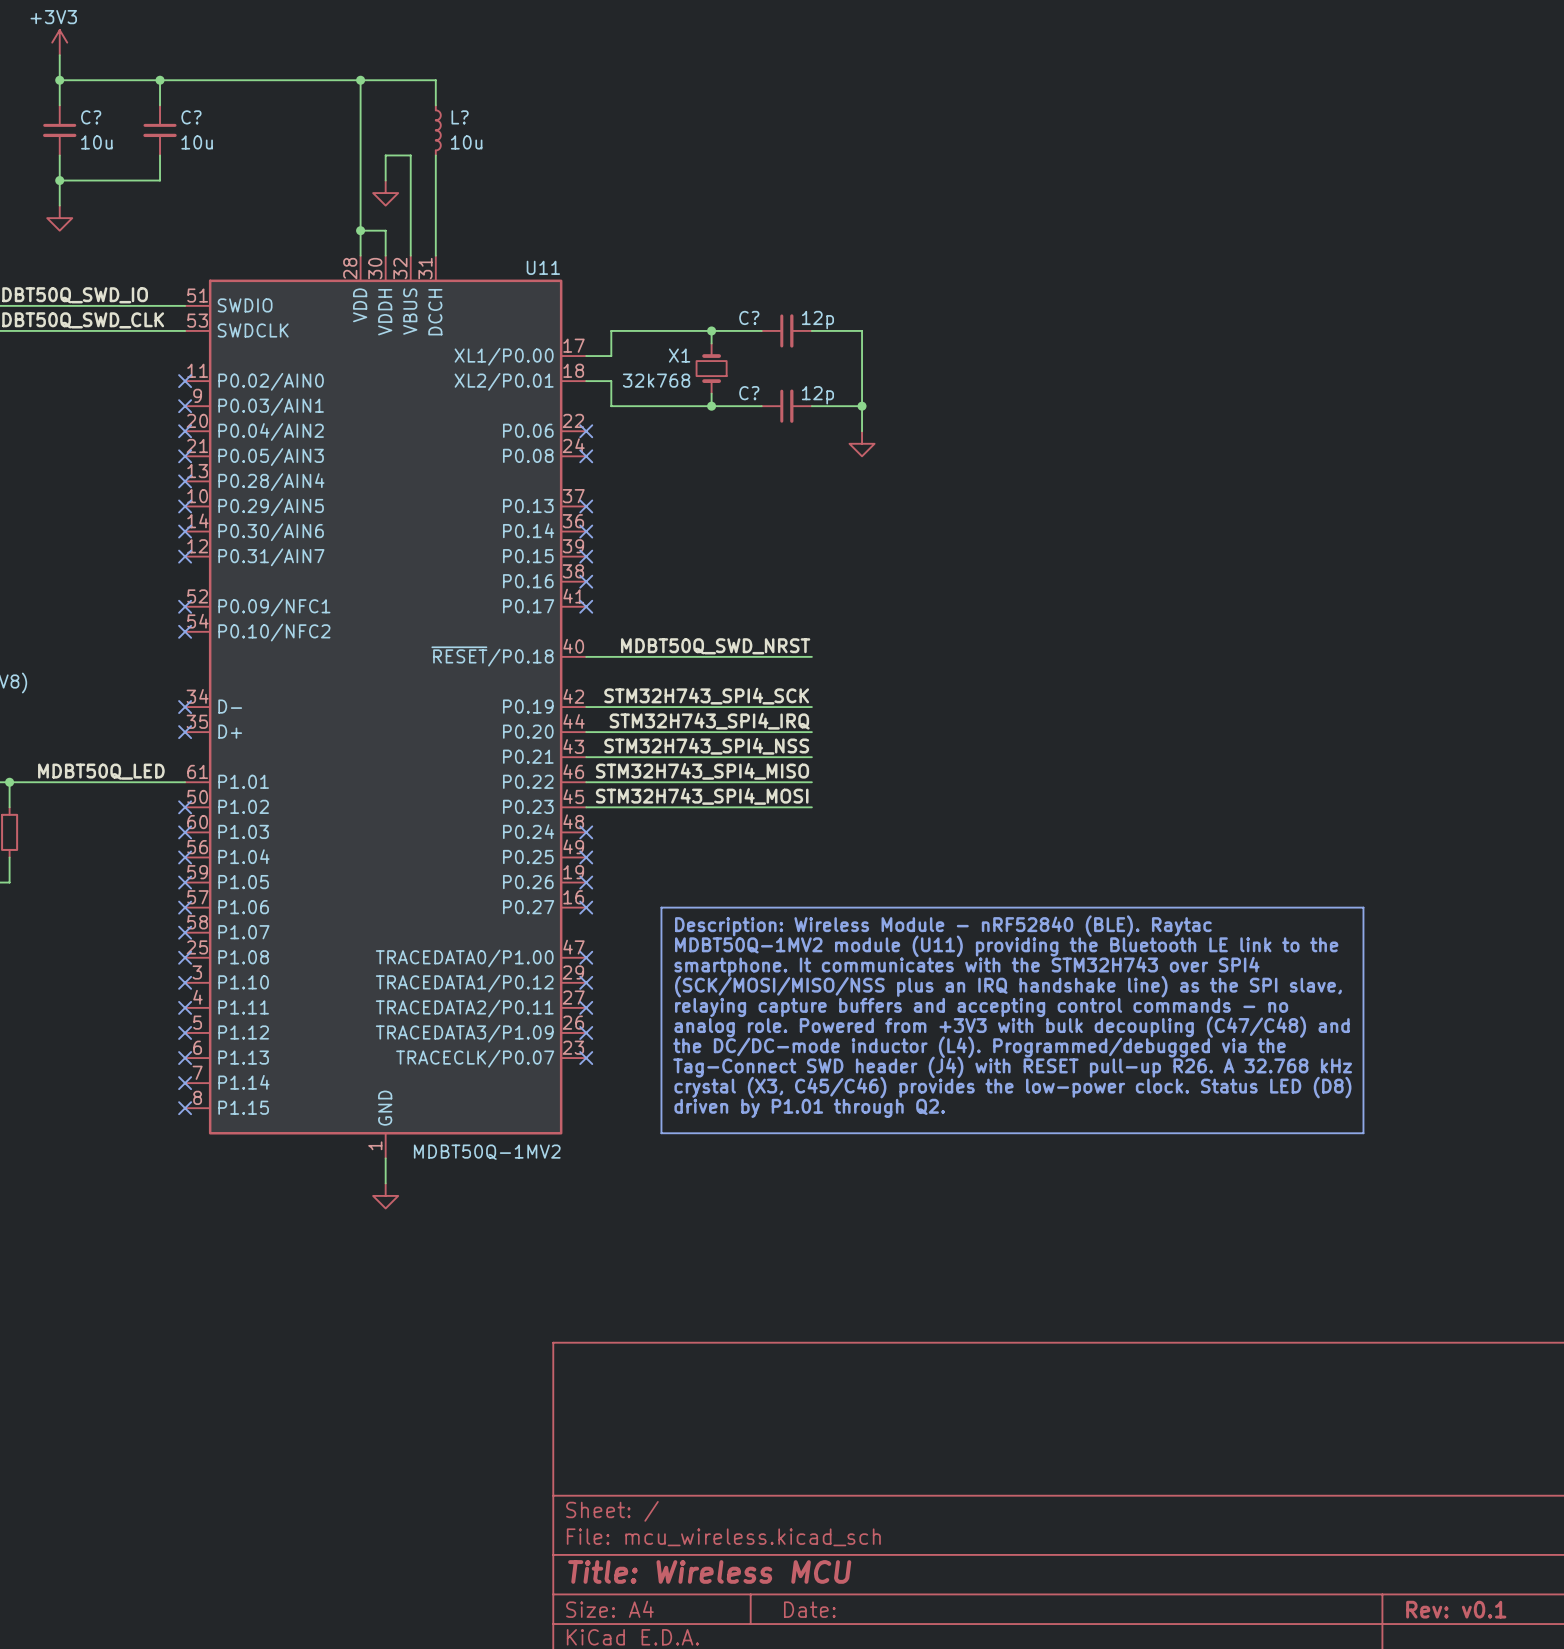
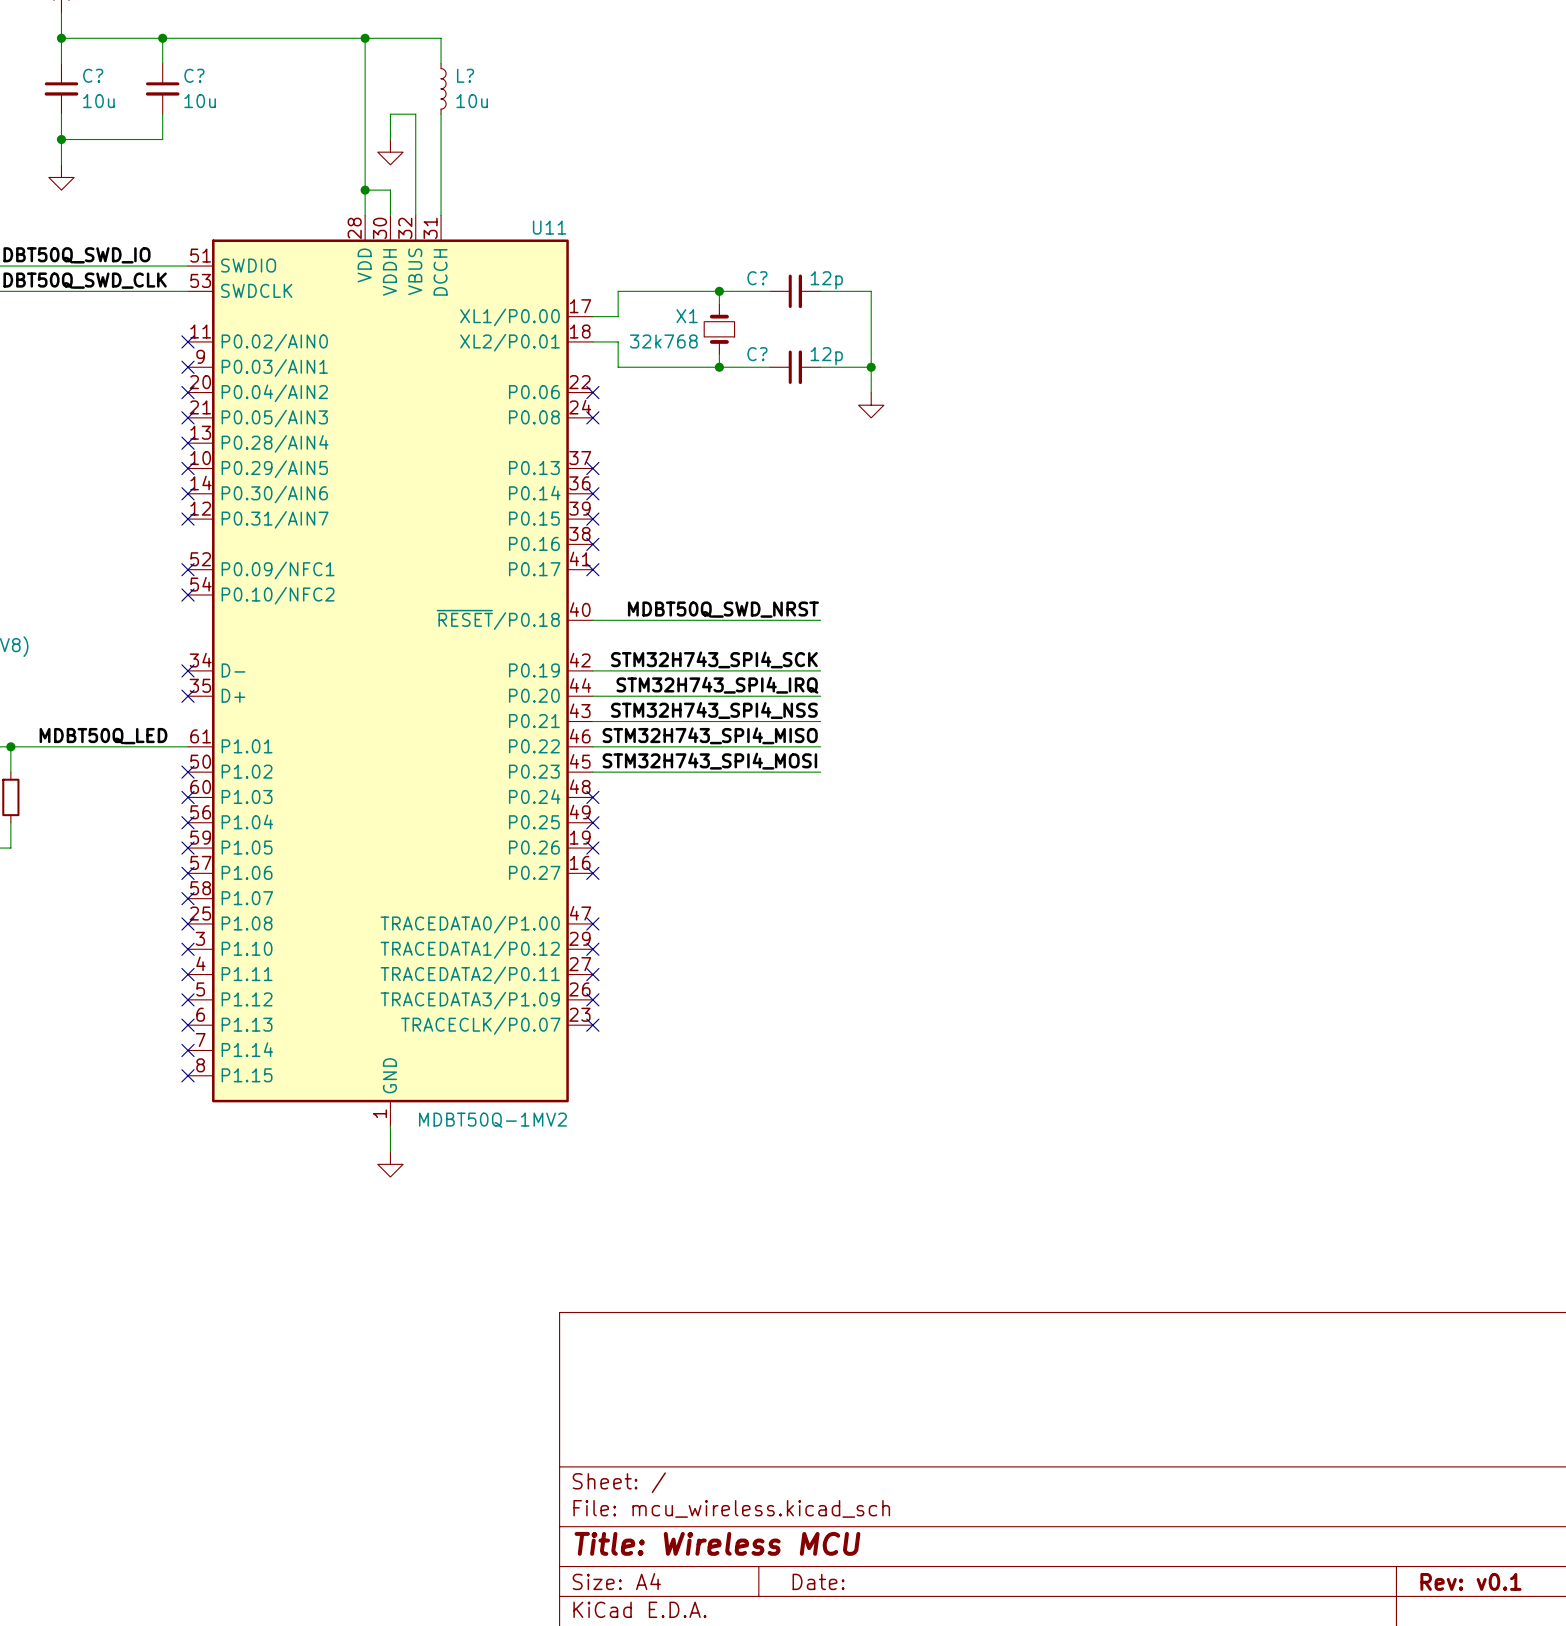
line: (661, 907) (1363, 907) (1363, 1133) (661, 1133) (661, 907) -> none
text: Description: Wireless Module - nRF52840 (BLE). Raytac (943, 926) -> none
text: MDBT50Q-1MV2 module (U11) providing the Bluetooth LE link to the (1006, 946) -> none
text: smartphone. It communicates with the STM32H743 over SPI4 (966, 966) -> none
text: (SCK/MOSI/MISO/NSS plus an IRQ handshake line) as the SPI slave, (1008, 986) -> none
text: relaying capture buffers and accepting control commands - no (981, 1007) -> none
text: analog role. Powered from +3V3 with bulk decoupling (C47/C48) and (1012, 1027) -> none
text: the DC/DC-mode inductor (L4). Programmed/debugged via the (979, 1047) -> none
text: Tag-Connect SWD header (J4) with RESET pull-up R26. A 32.768 kHz (1012, 1067) -> none
text: crystal (X3, C45/C46) provides the low-power clock. Status LED (D8) (1012, 1087) -> none
text: driven by P1.01 through Q2. (809, 1108) -> none

